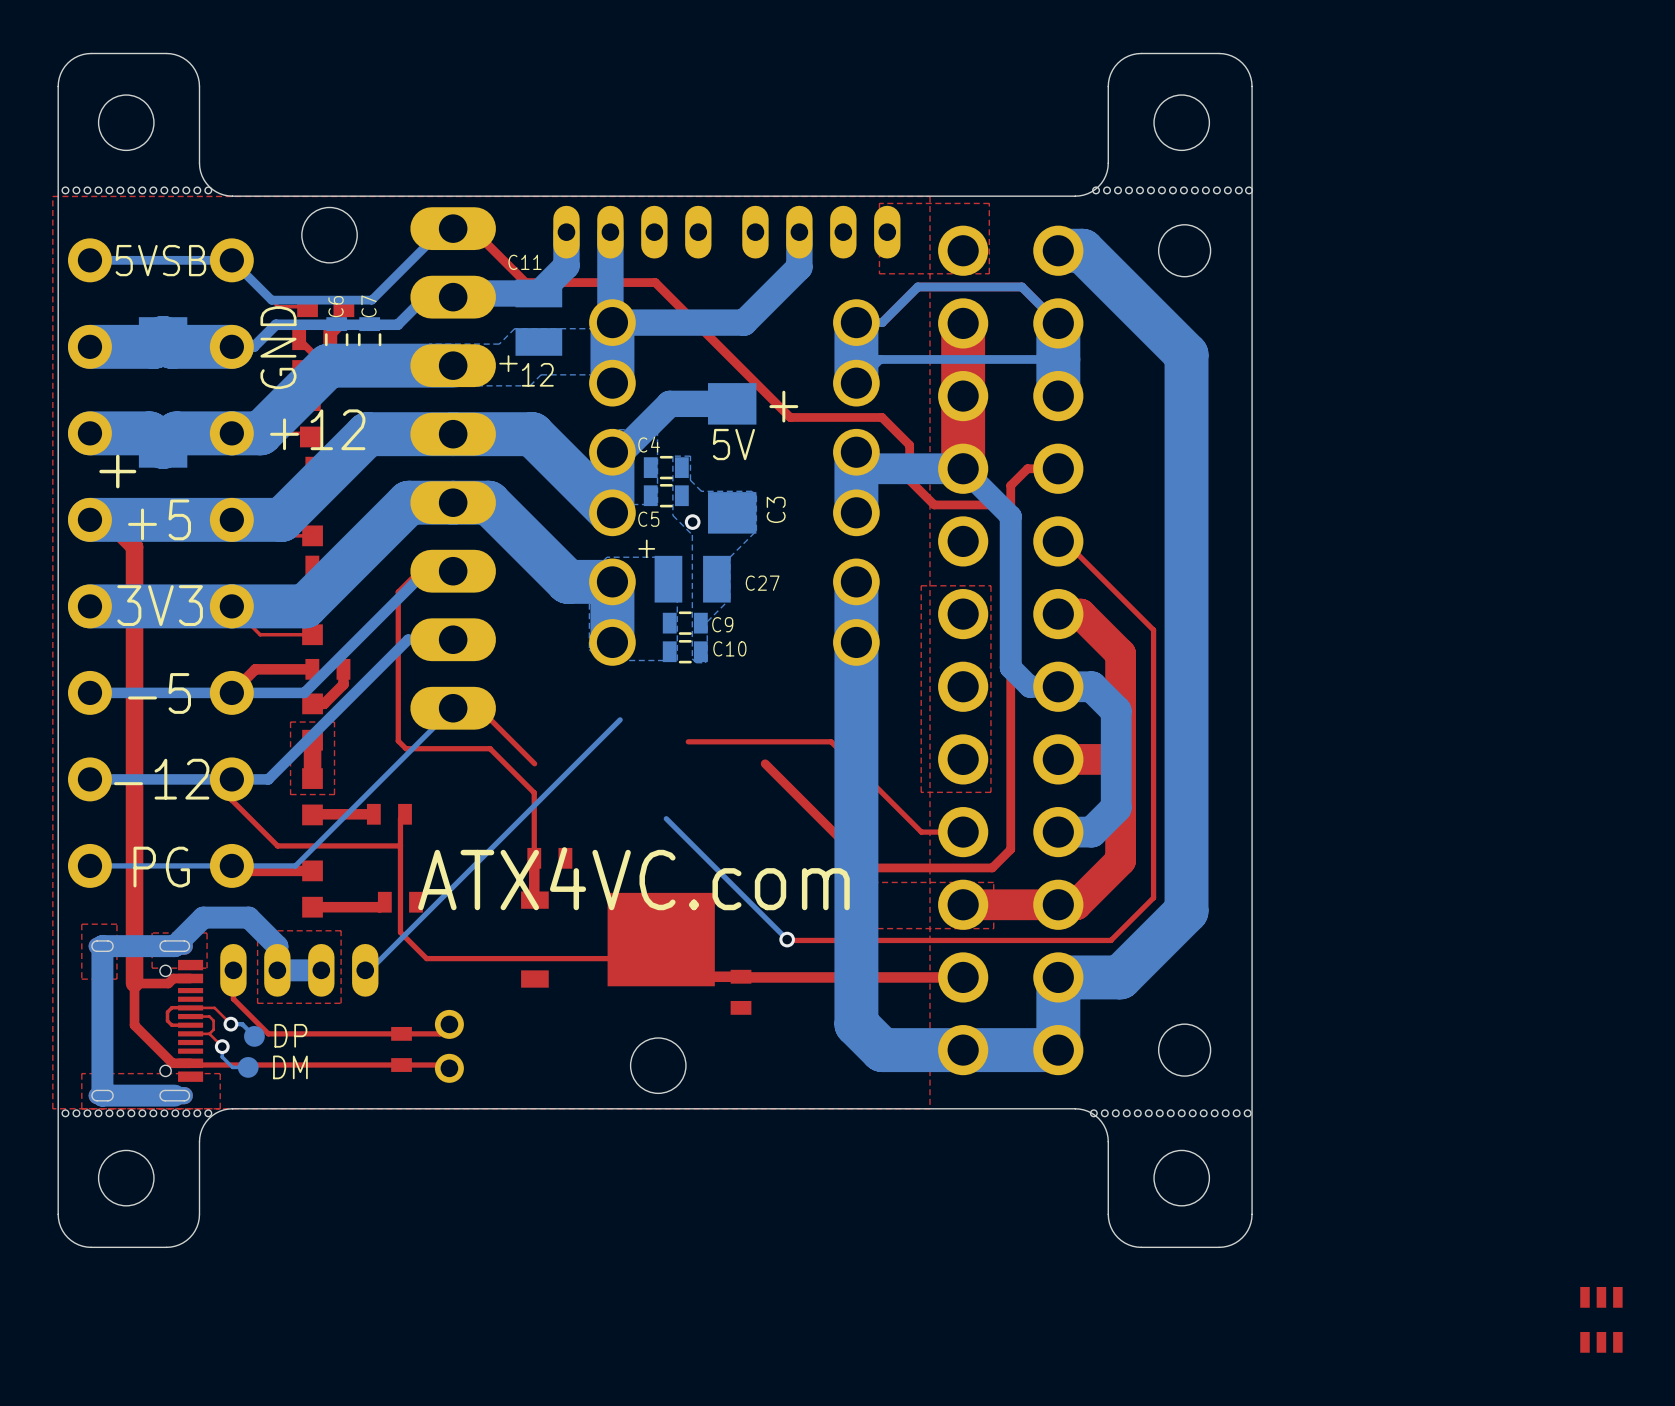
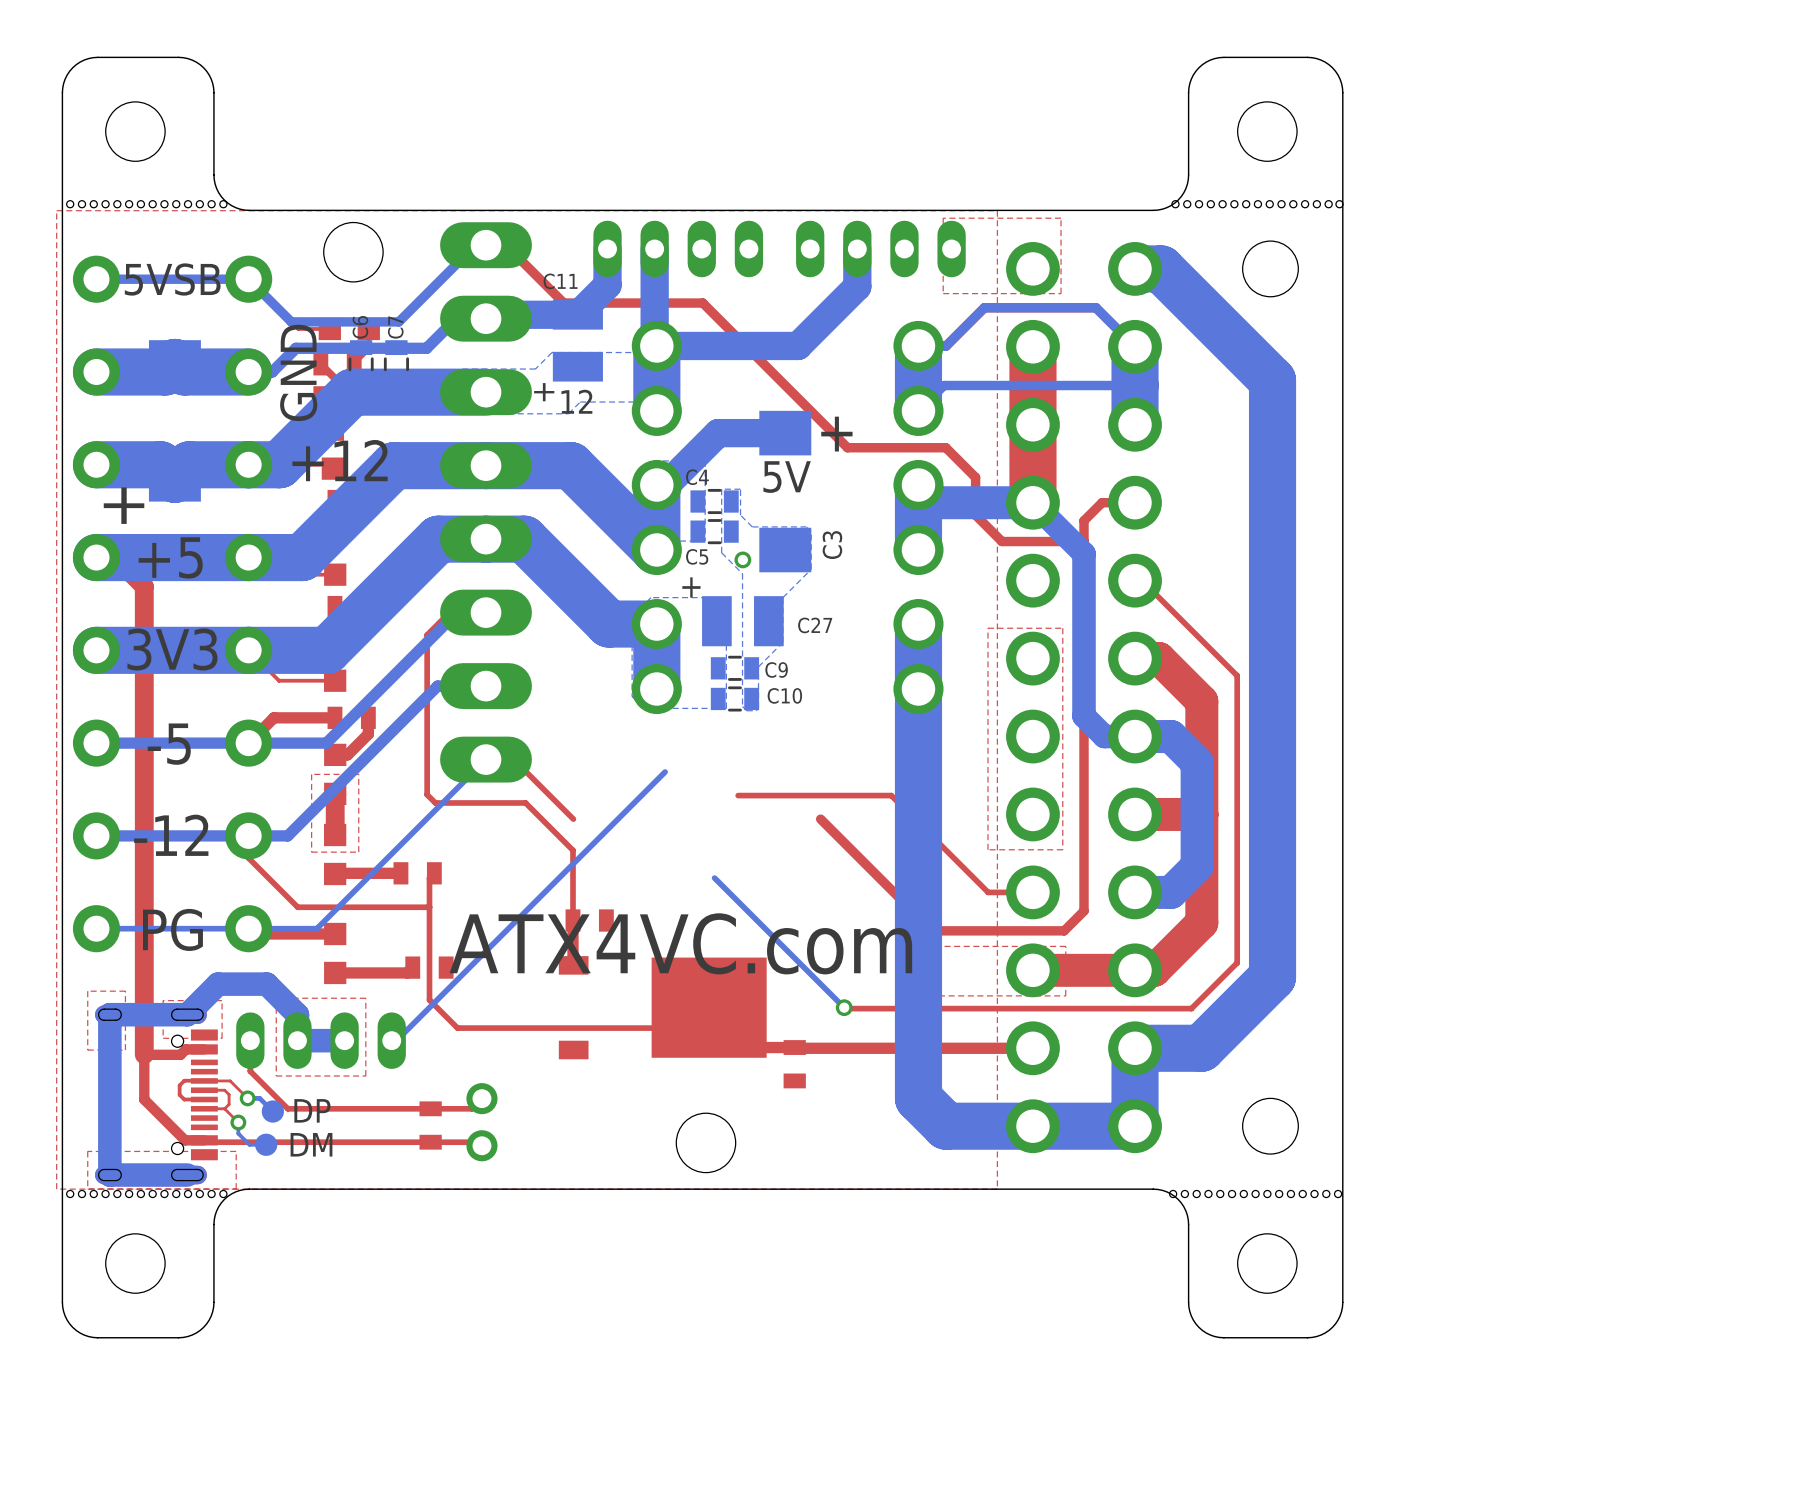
part: (1601, 1319) -> none

